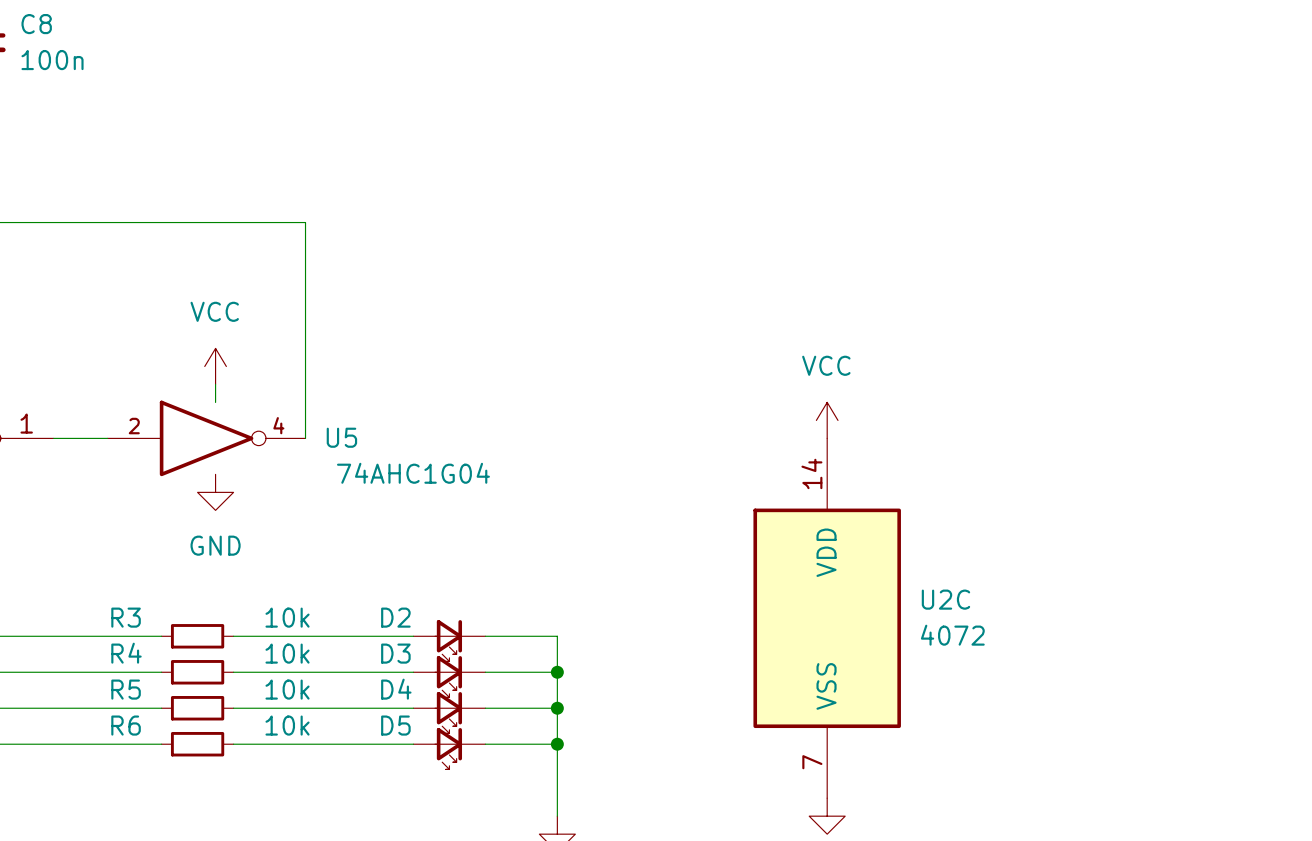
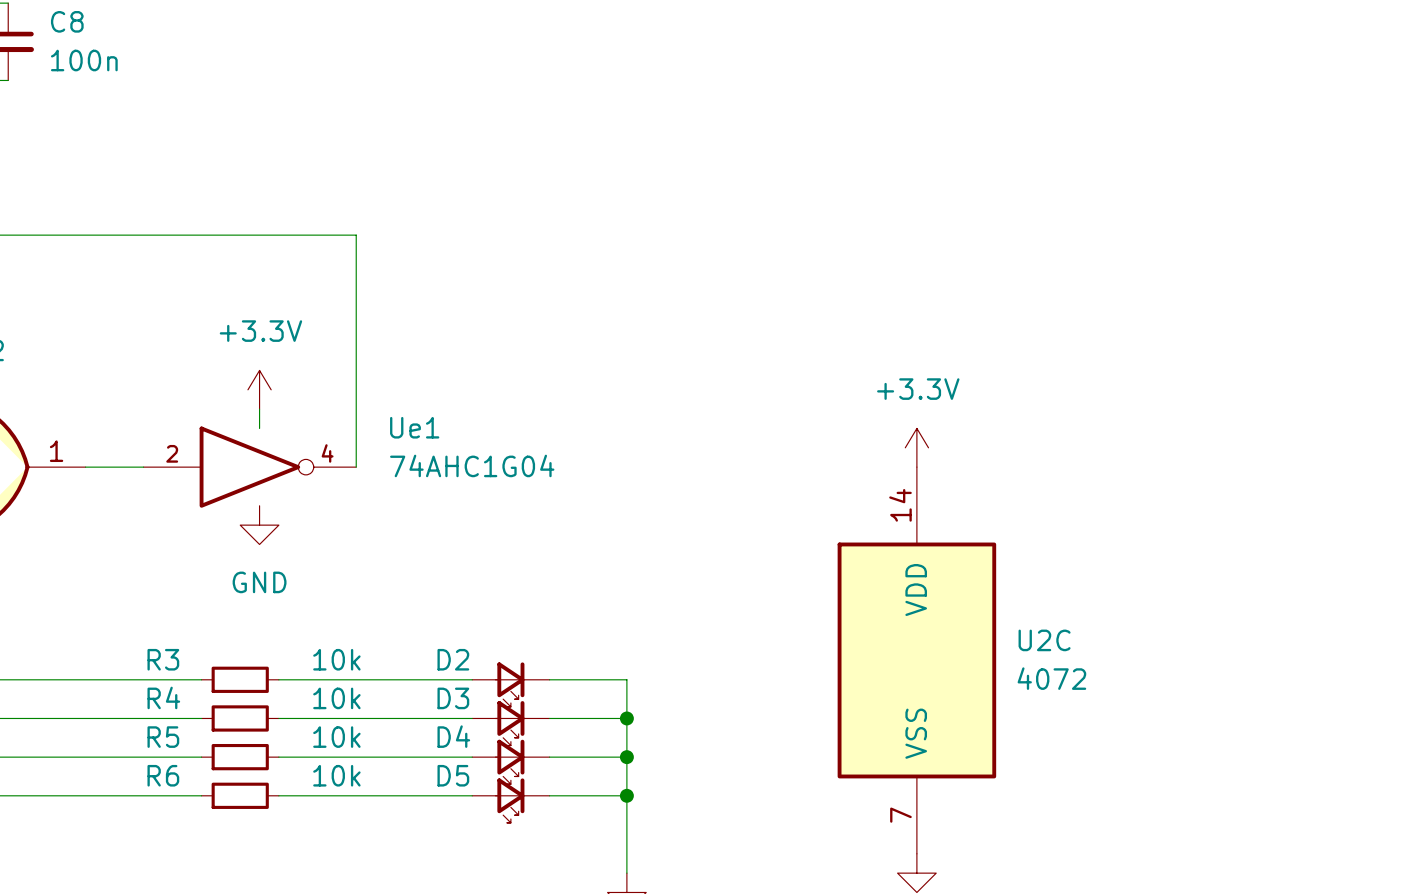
power symbol: VCC (215, 366) -> +3.3V (259, 389)
power symbol: VCC (827, 420) -> +3.3V (916, 447)
U5 name: U5 (341, 437) -> Ue1 (414, 427)
U5 value position: 74AHC1G04 (413, 473) -> 74AHC1G04 (472, 465)

